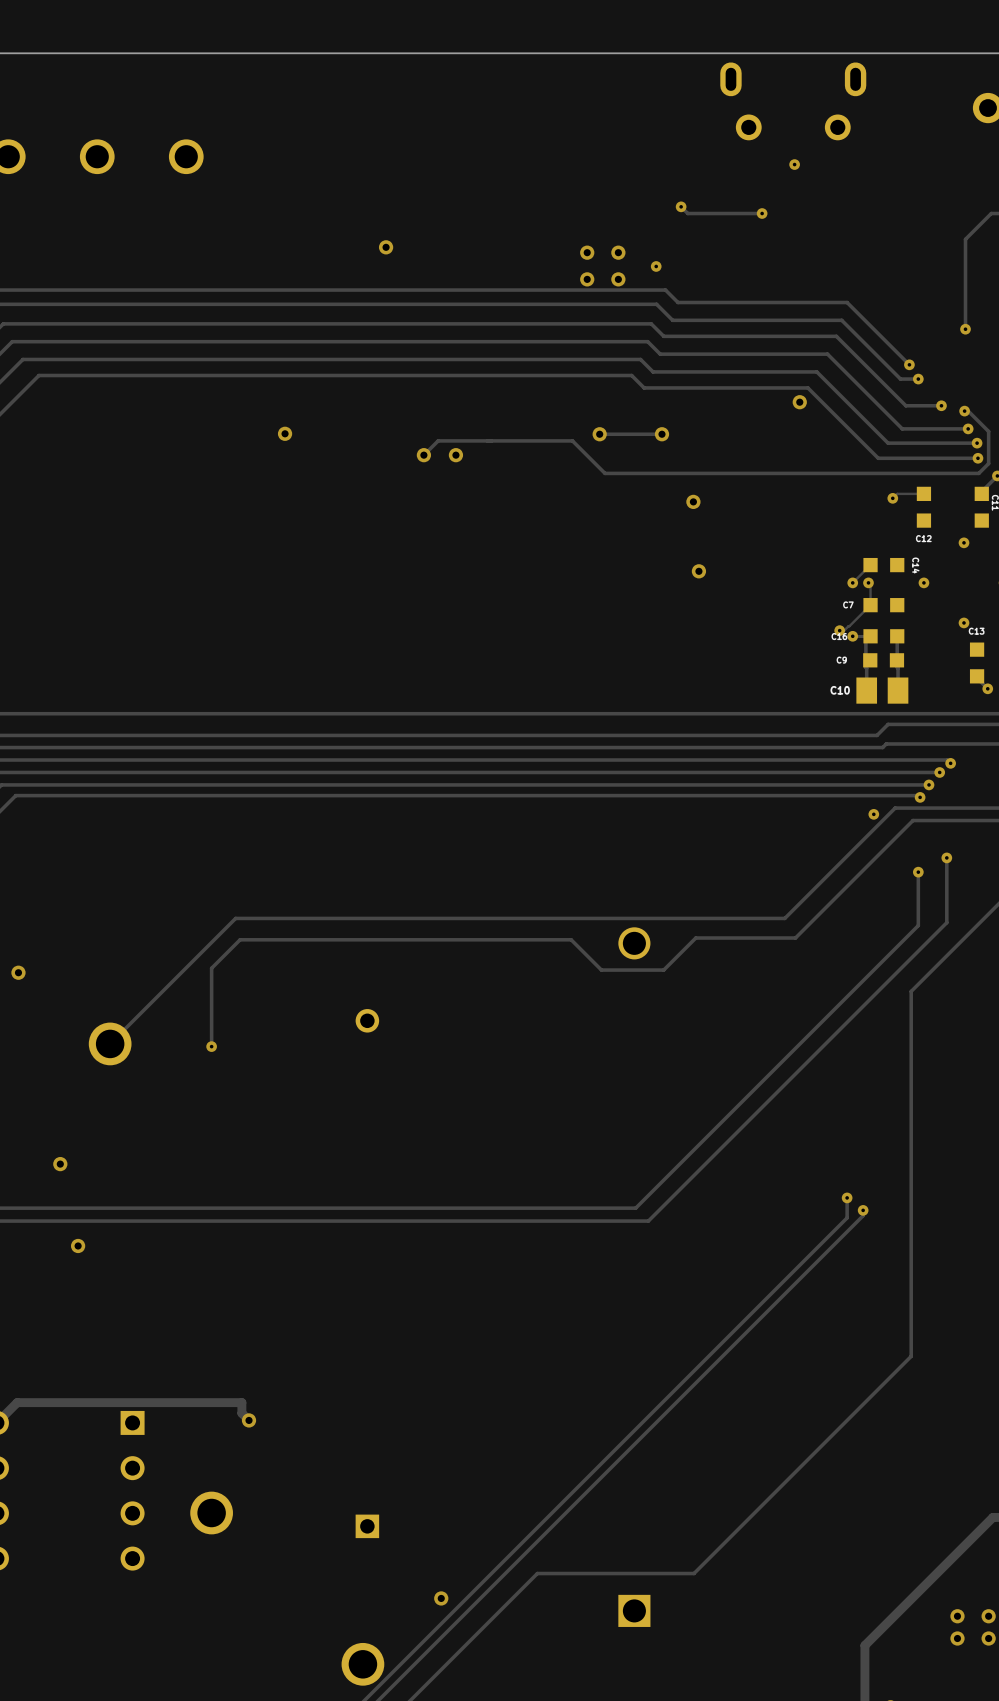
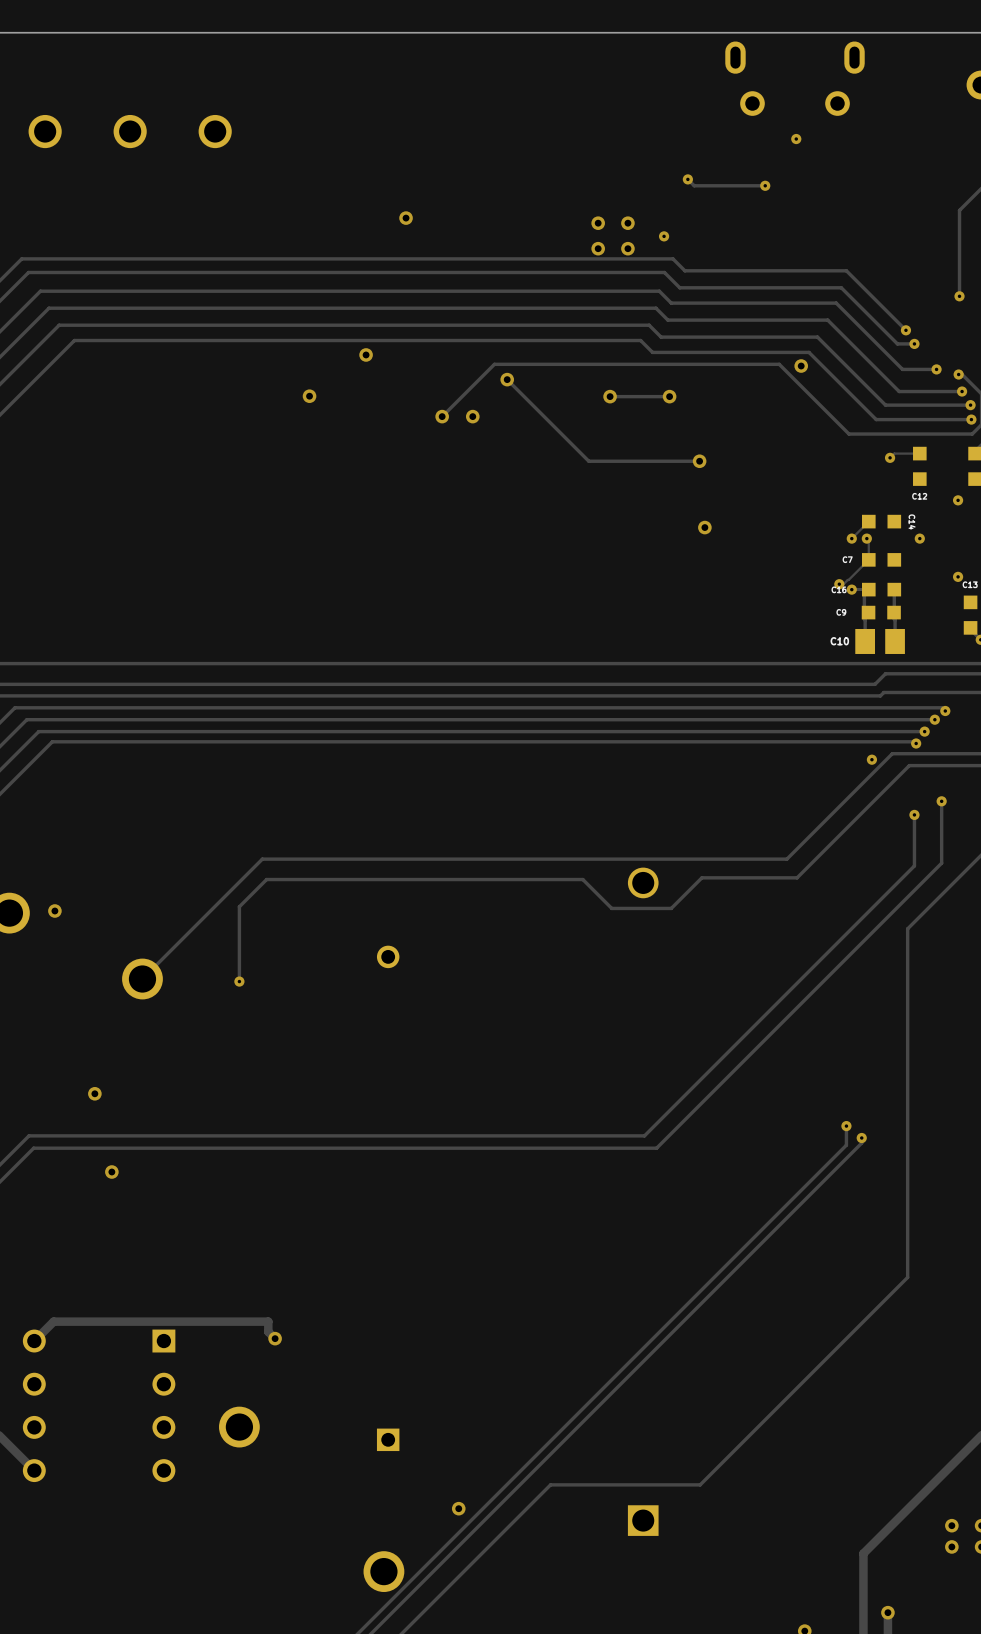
via: none -> (366, 354)
track: none -> (507, 379) (588, 461) (699, 461)
via: none -> (507, 379)
track: (438, 440) (572, 440) (605, 473) (849, 473) -> (455, 403) (494, 364) (779, 364) (848, 434)

